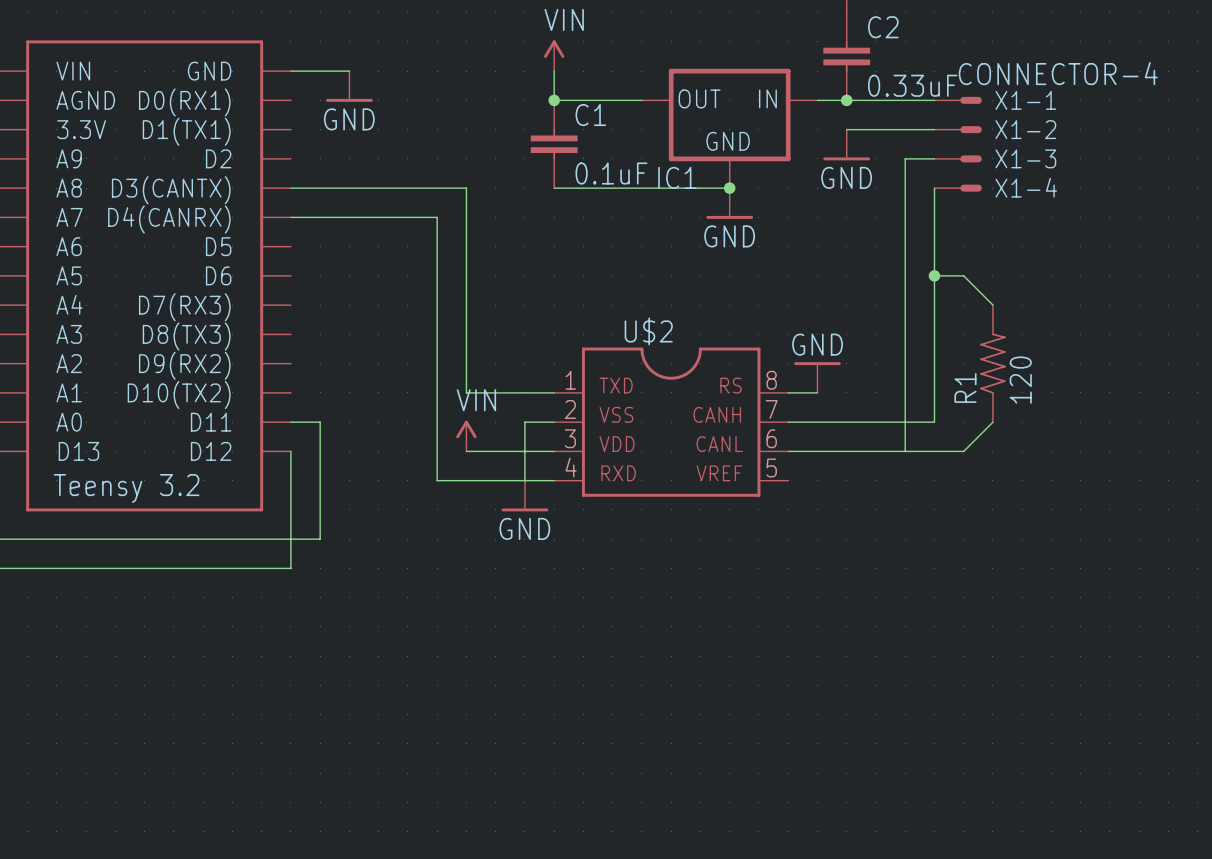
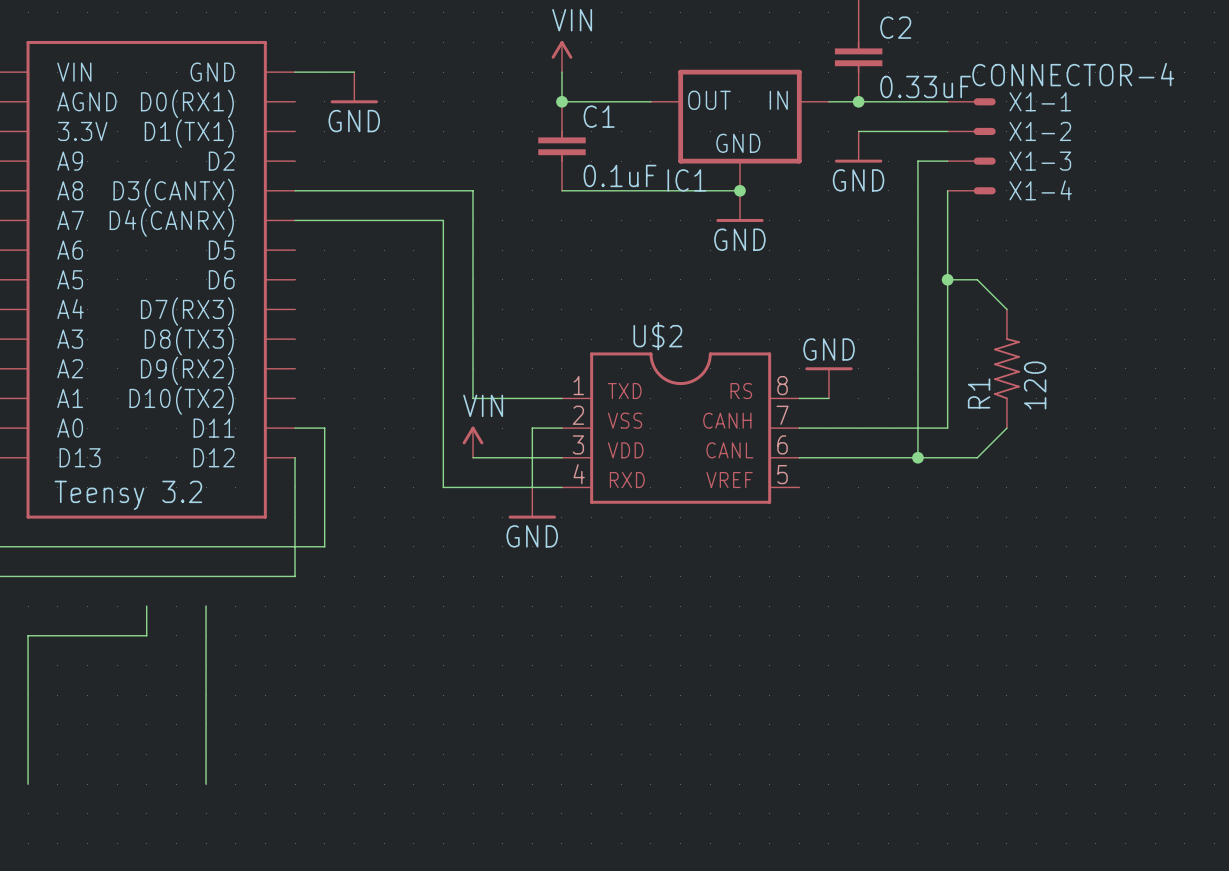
junction: none -> (917, 457)
wire: none -> (146, 606) (146, 635) (28, 635) (28, 784)
wire: none -> (206, 606) (206, 784)

